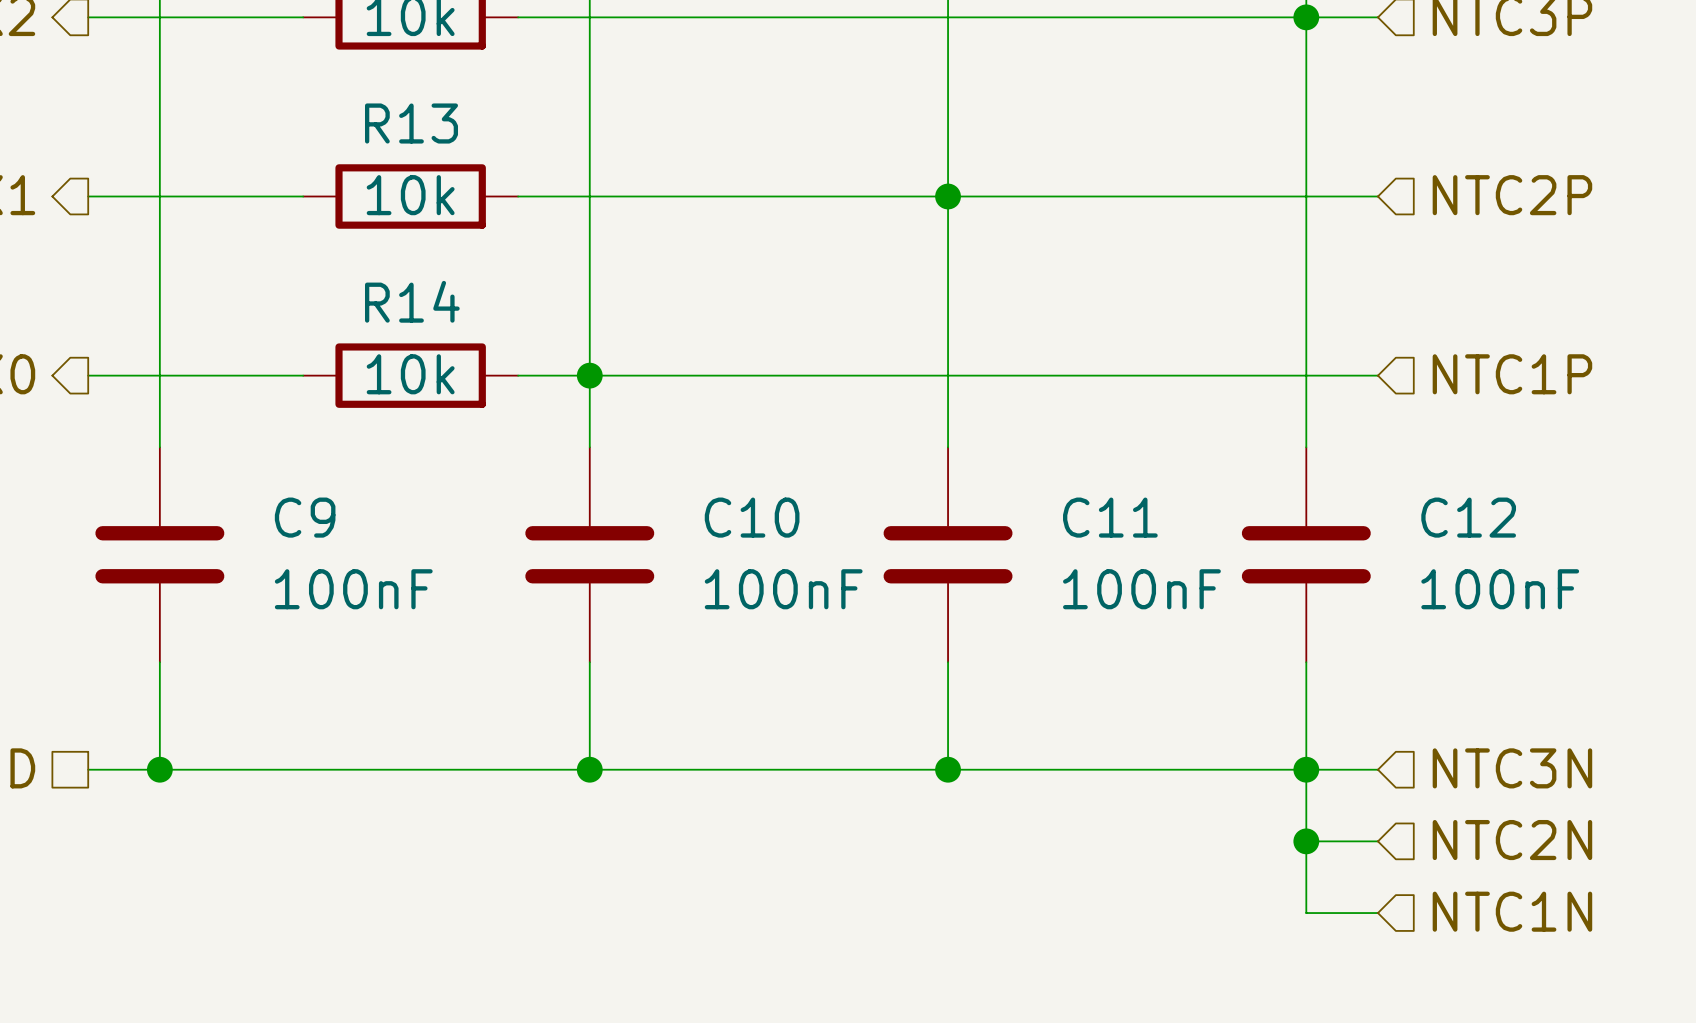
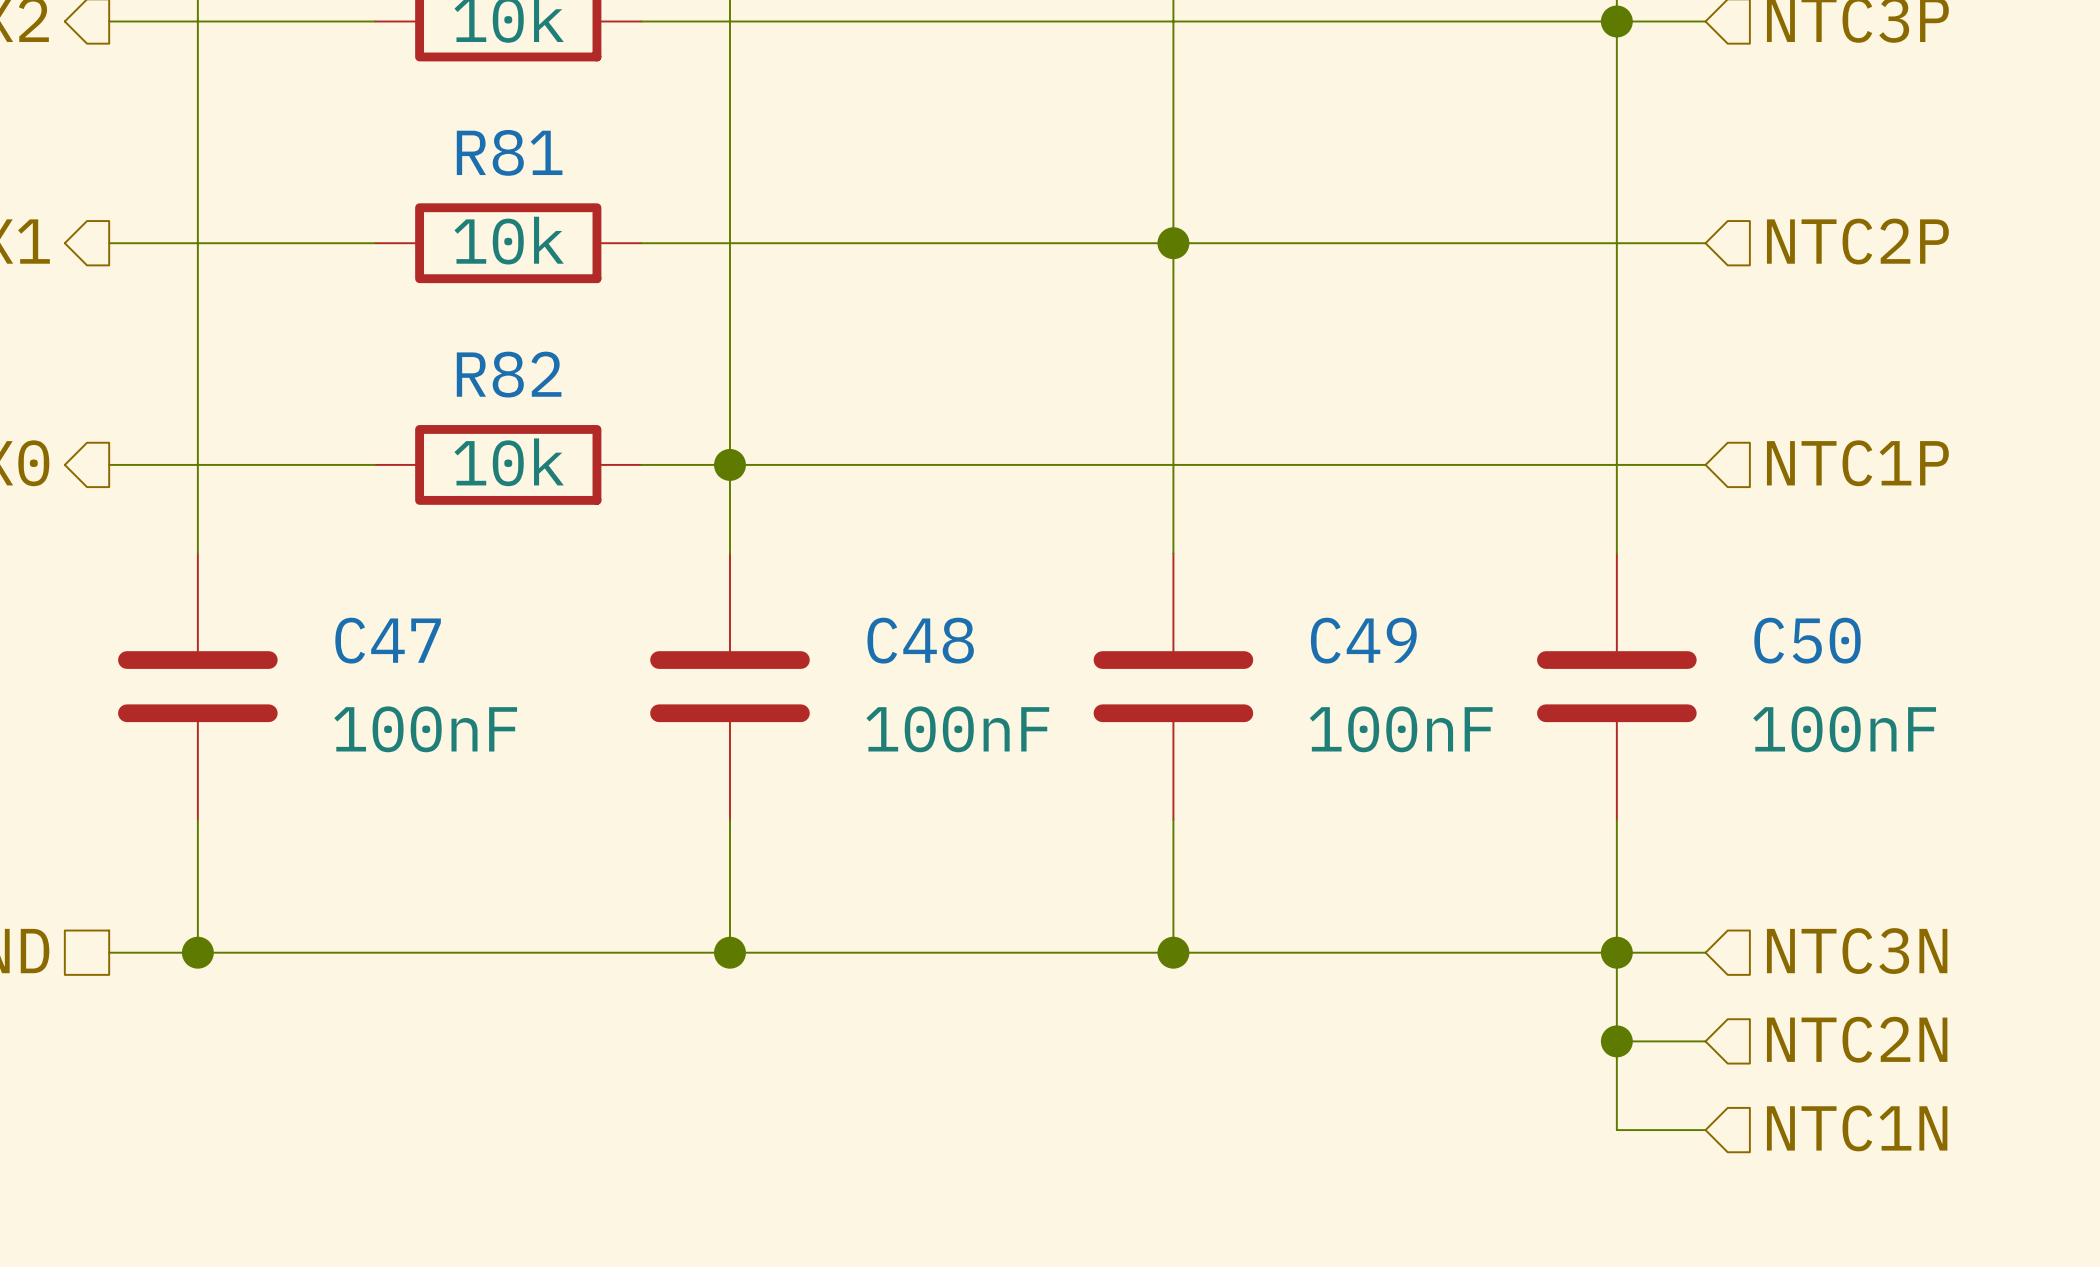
R13 name: R13 (411, 123) -> R81 (509, 152)
R14 name: R14 (412, 301) -> R82 (509, 374)
C9 name: C9 (305, 517) -> C47 (388, 640)
C10 name: C10 (752, 517) -> C48 (920, 640)
C11 name: C11 (1110, 517) -> C49 (1363, 640)
C12 name: C12 (1468, 517) -> C50 (1807, 640)

